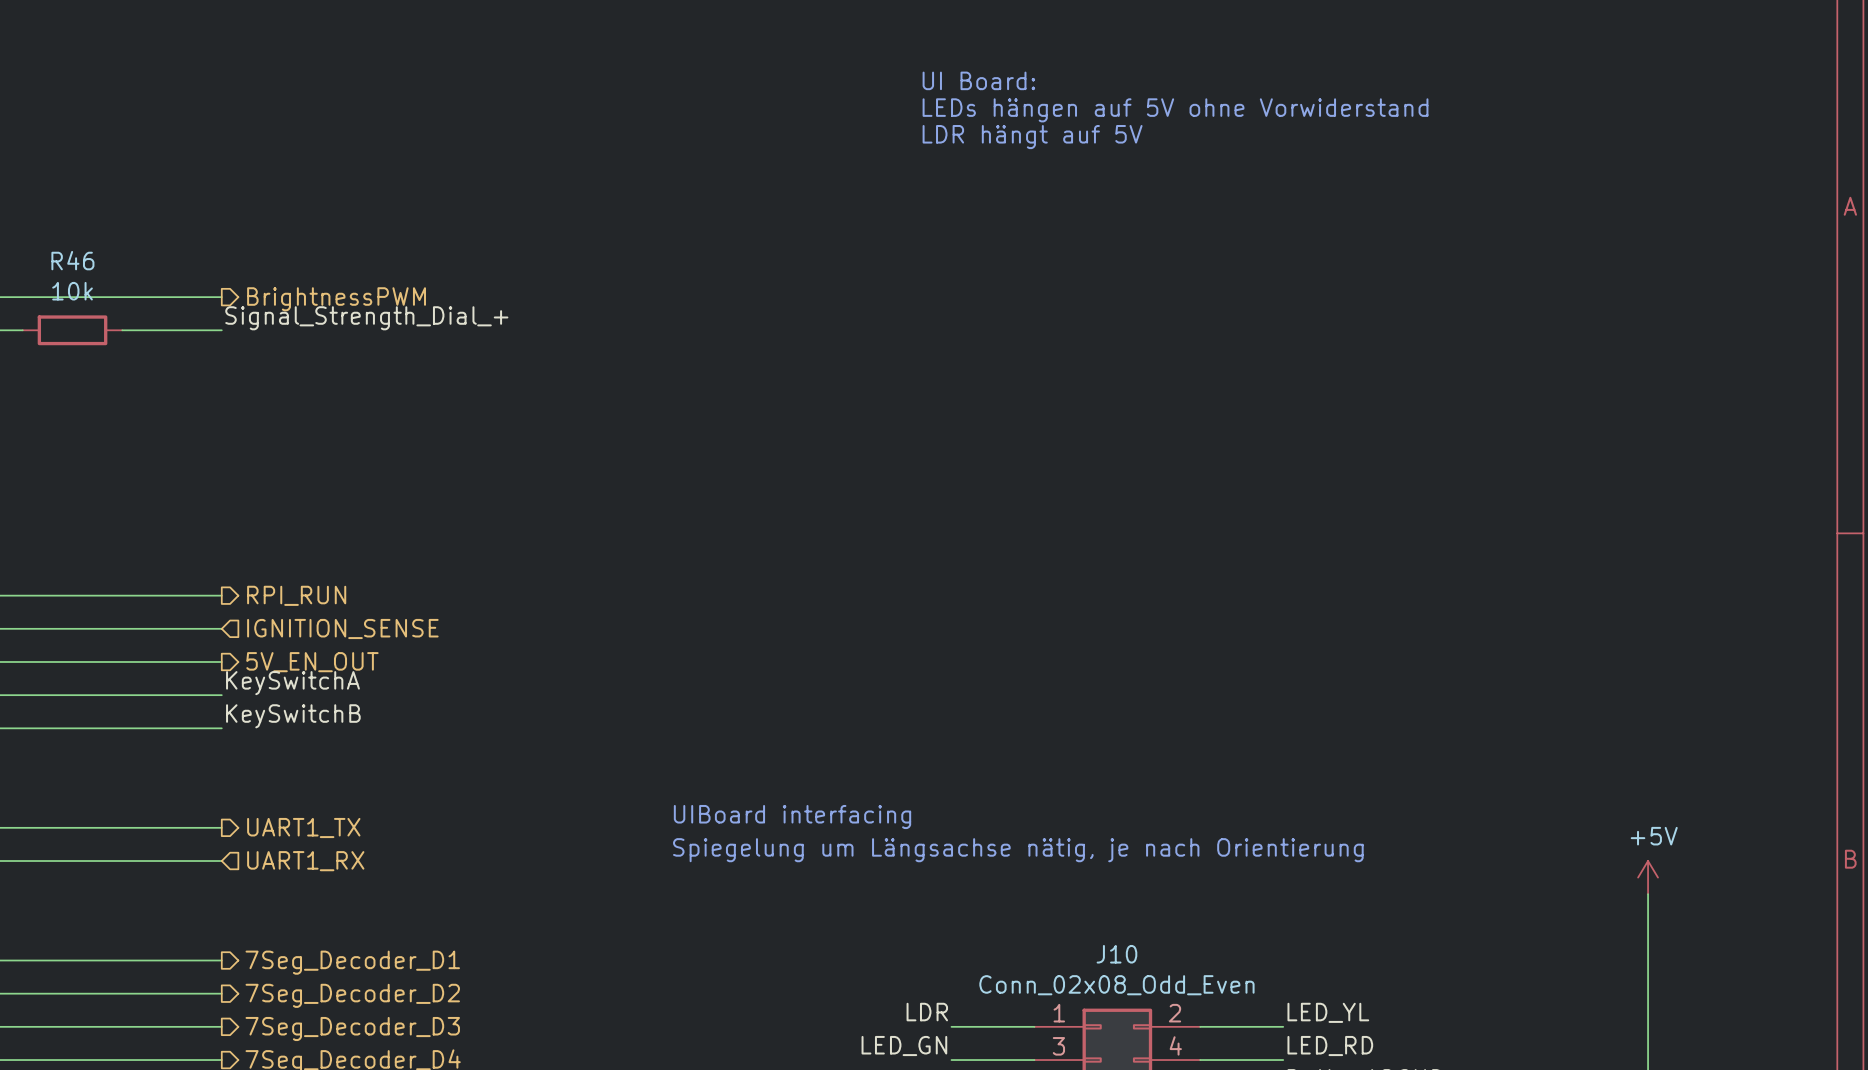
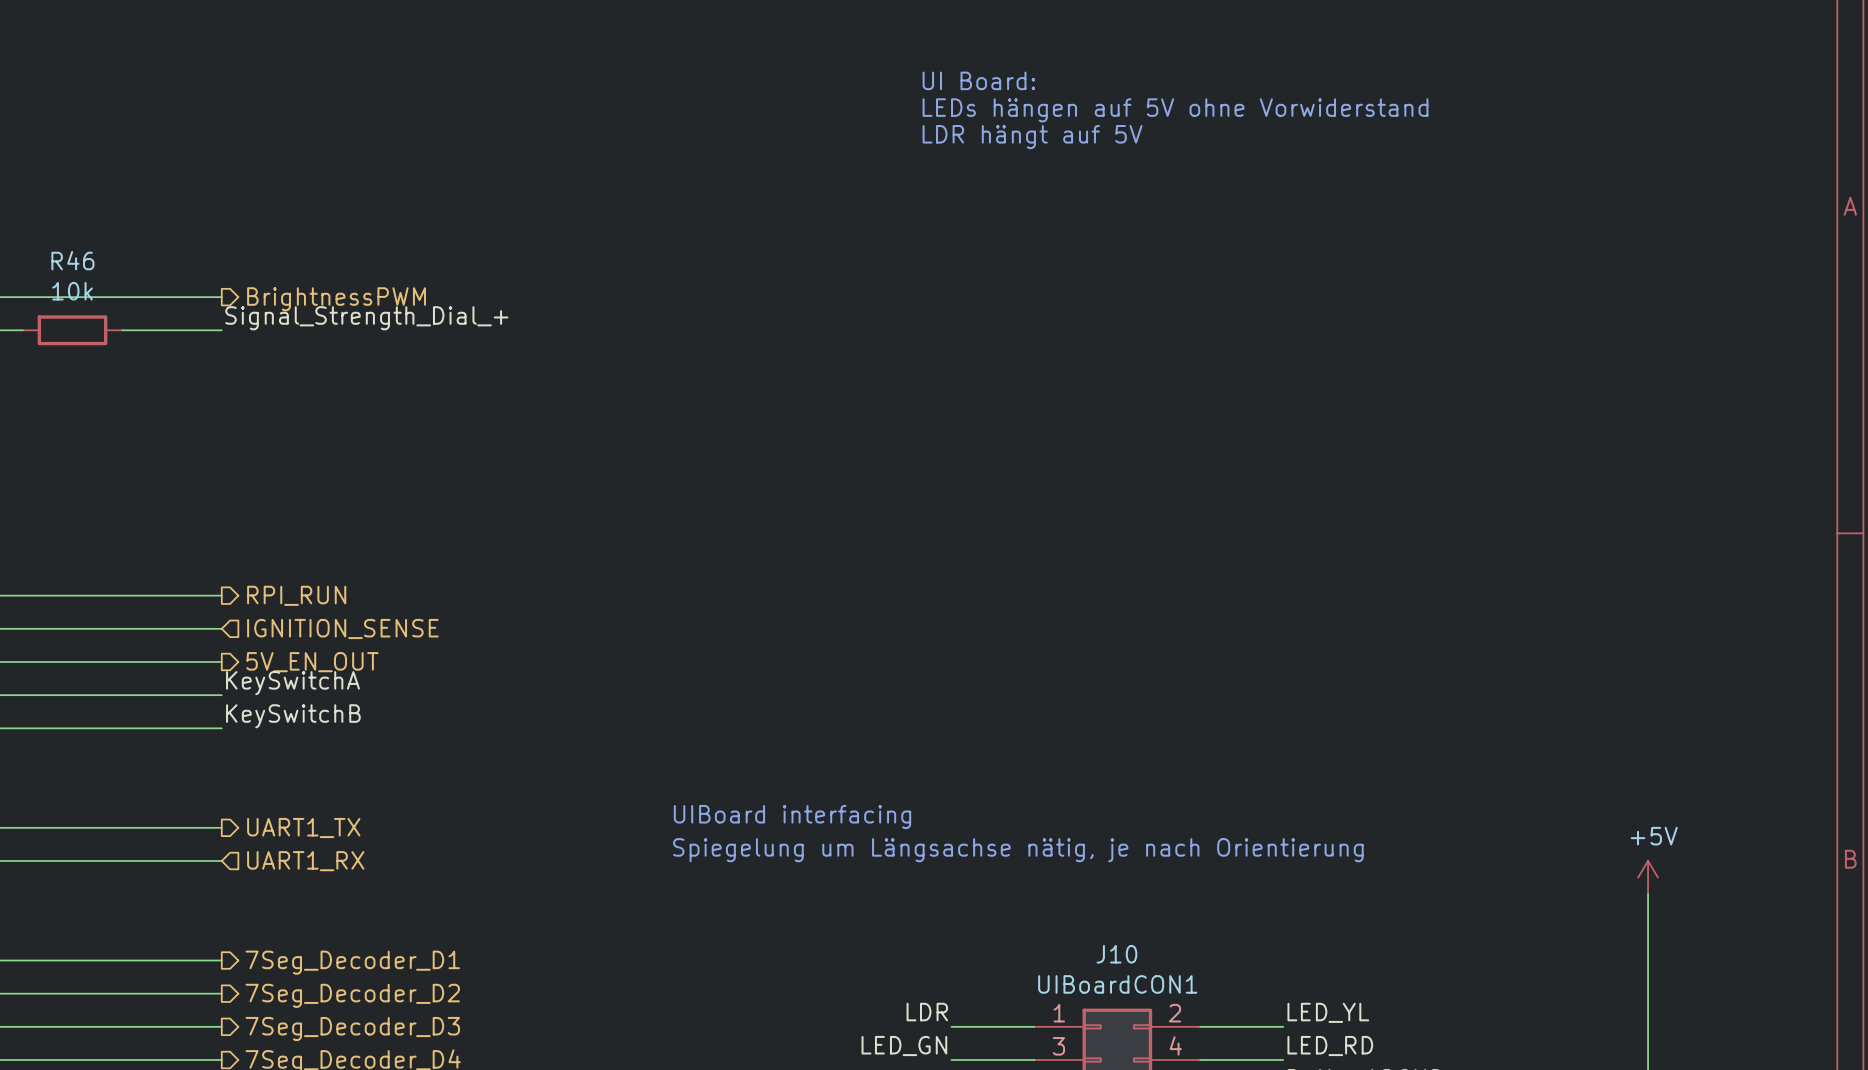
J10 value: Conn_02x08_Odd_Even (1116, 985) -> UIBoardCON1 (1117, 984)

